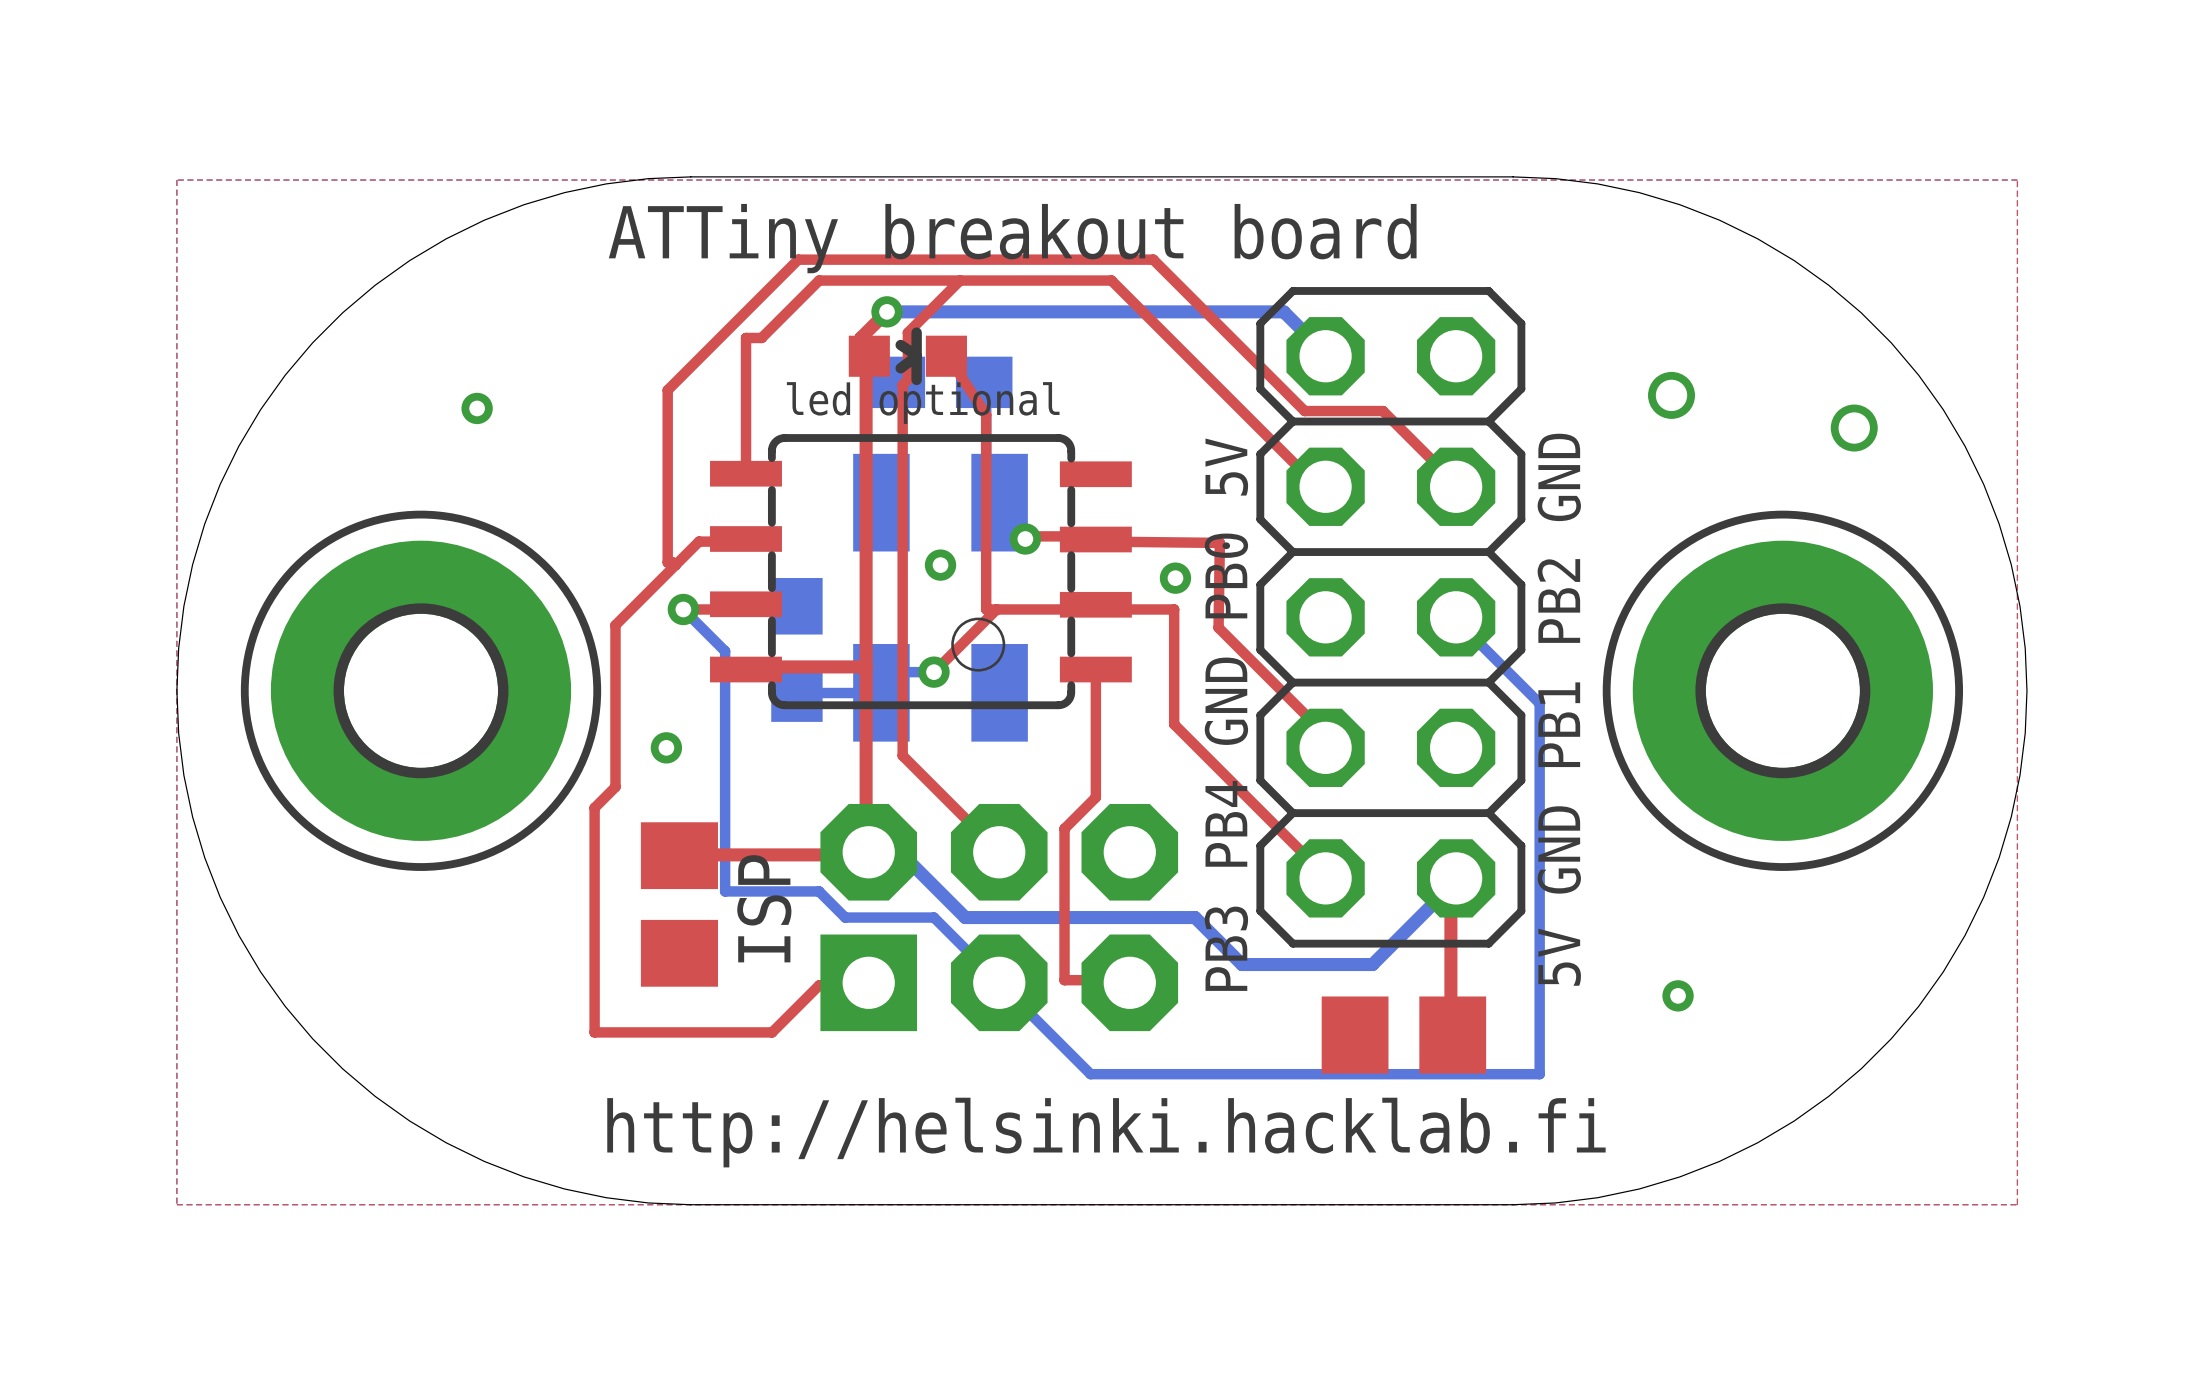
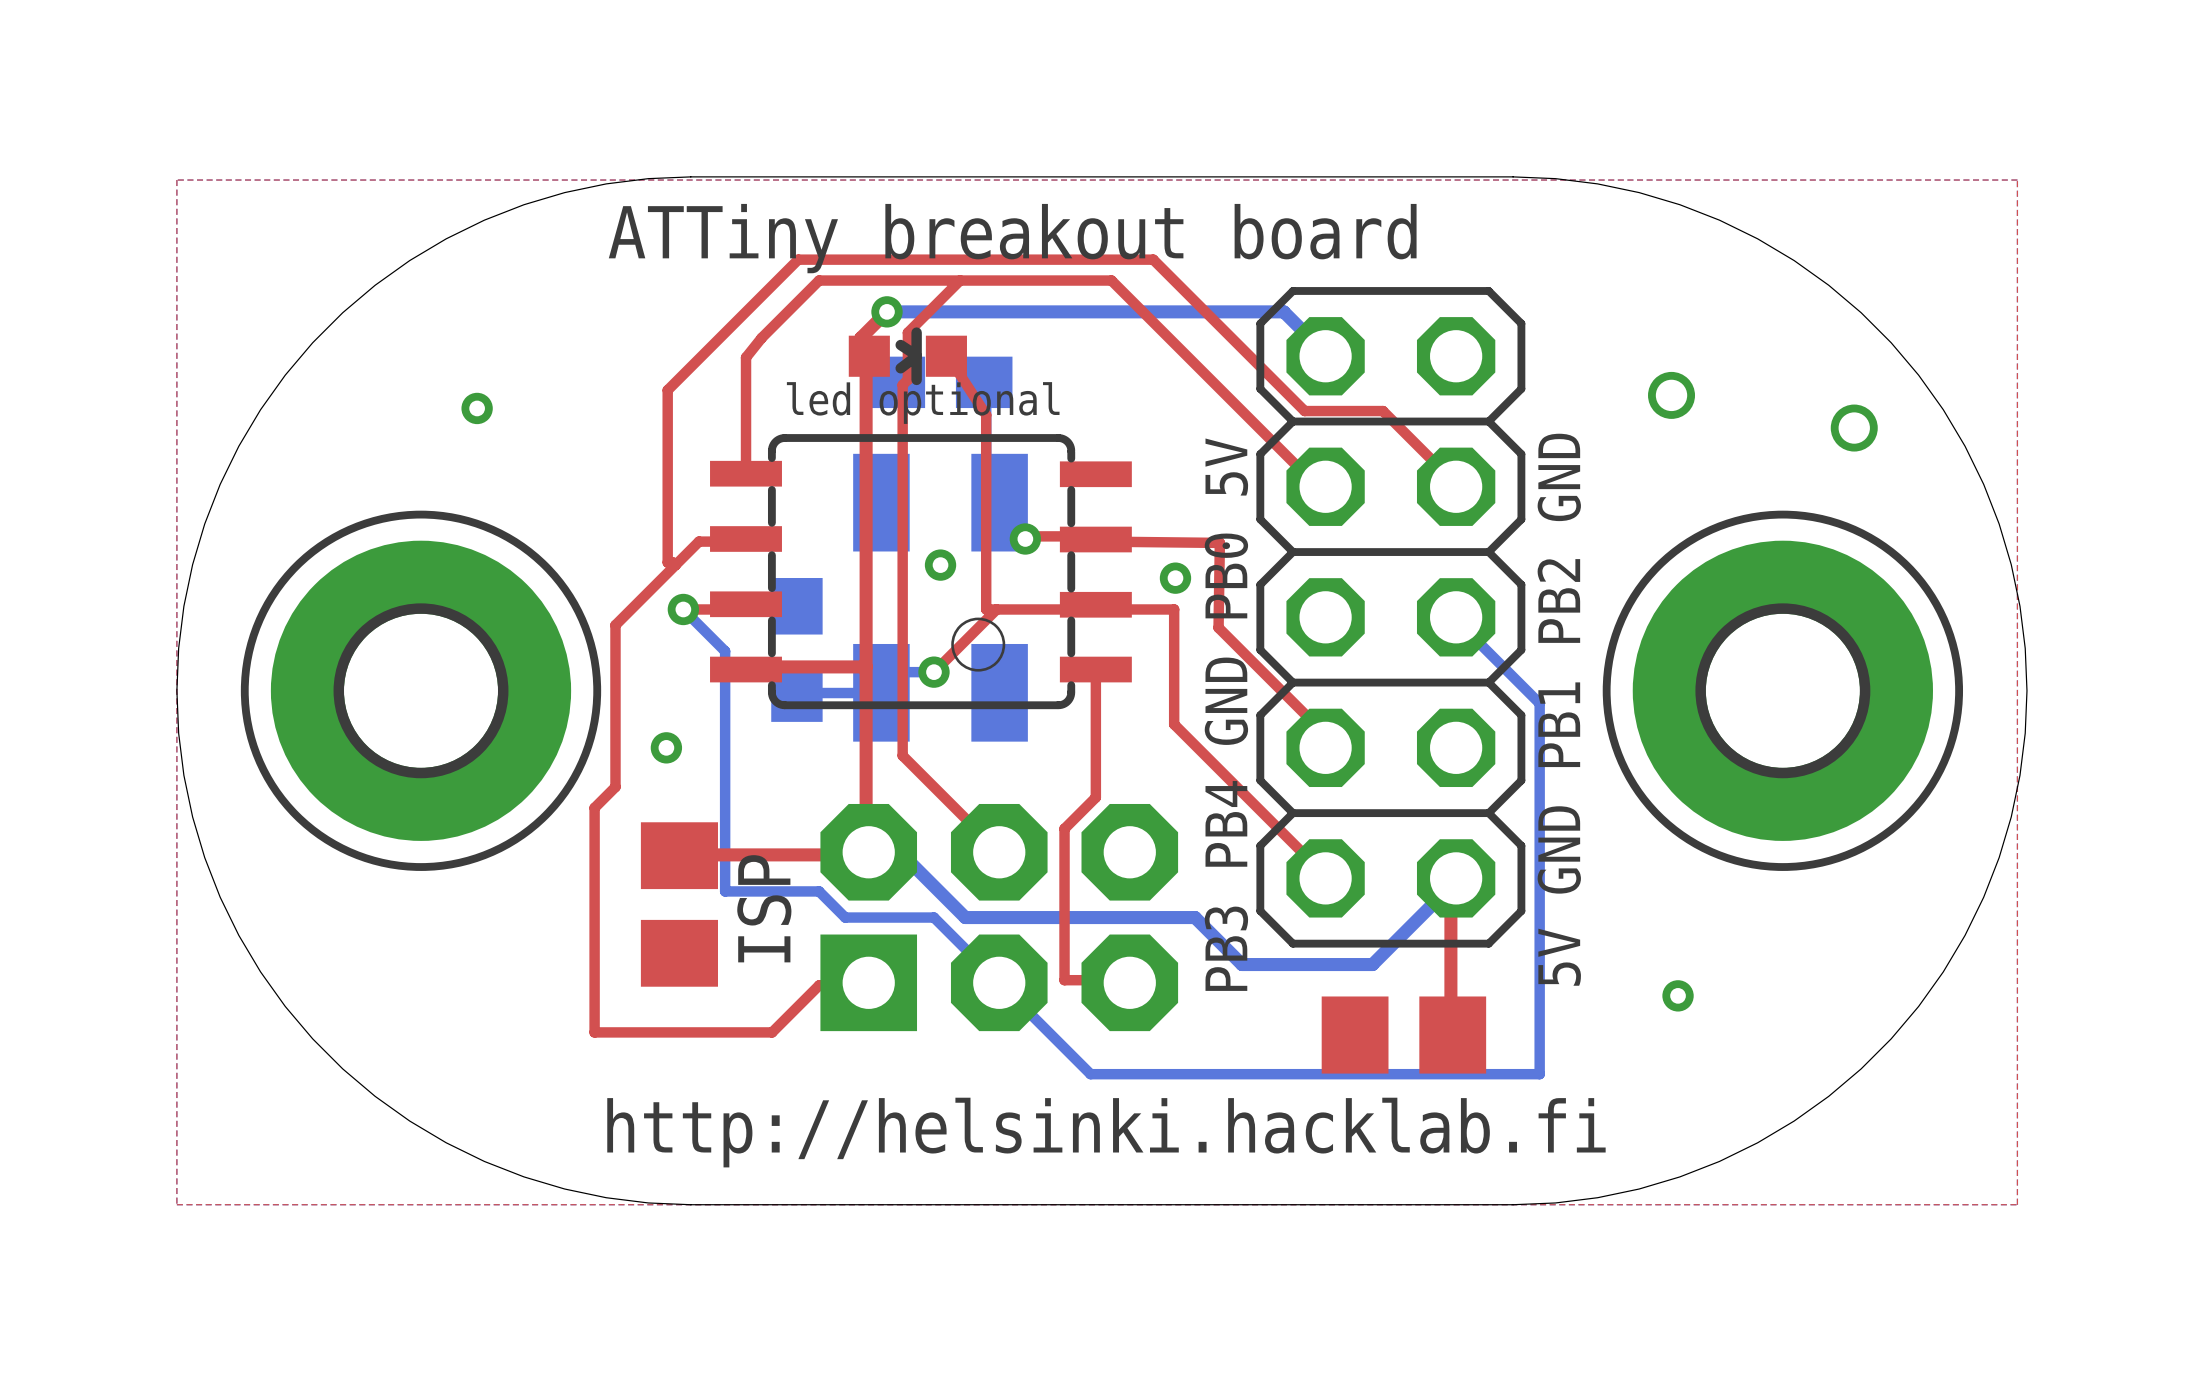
top track: (761, 337) (746, 337) (746, 357) -> (761, 337) (746, 357)

